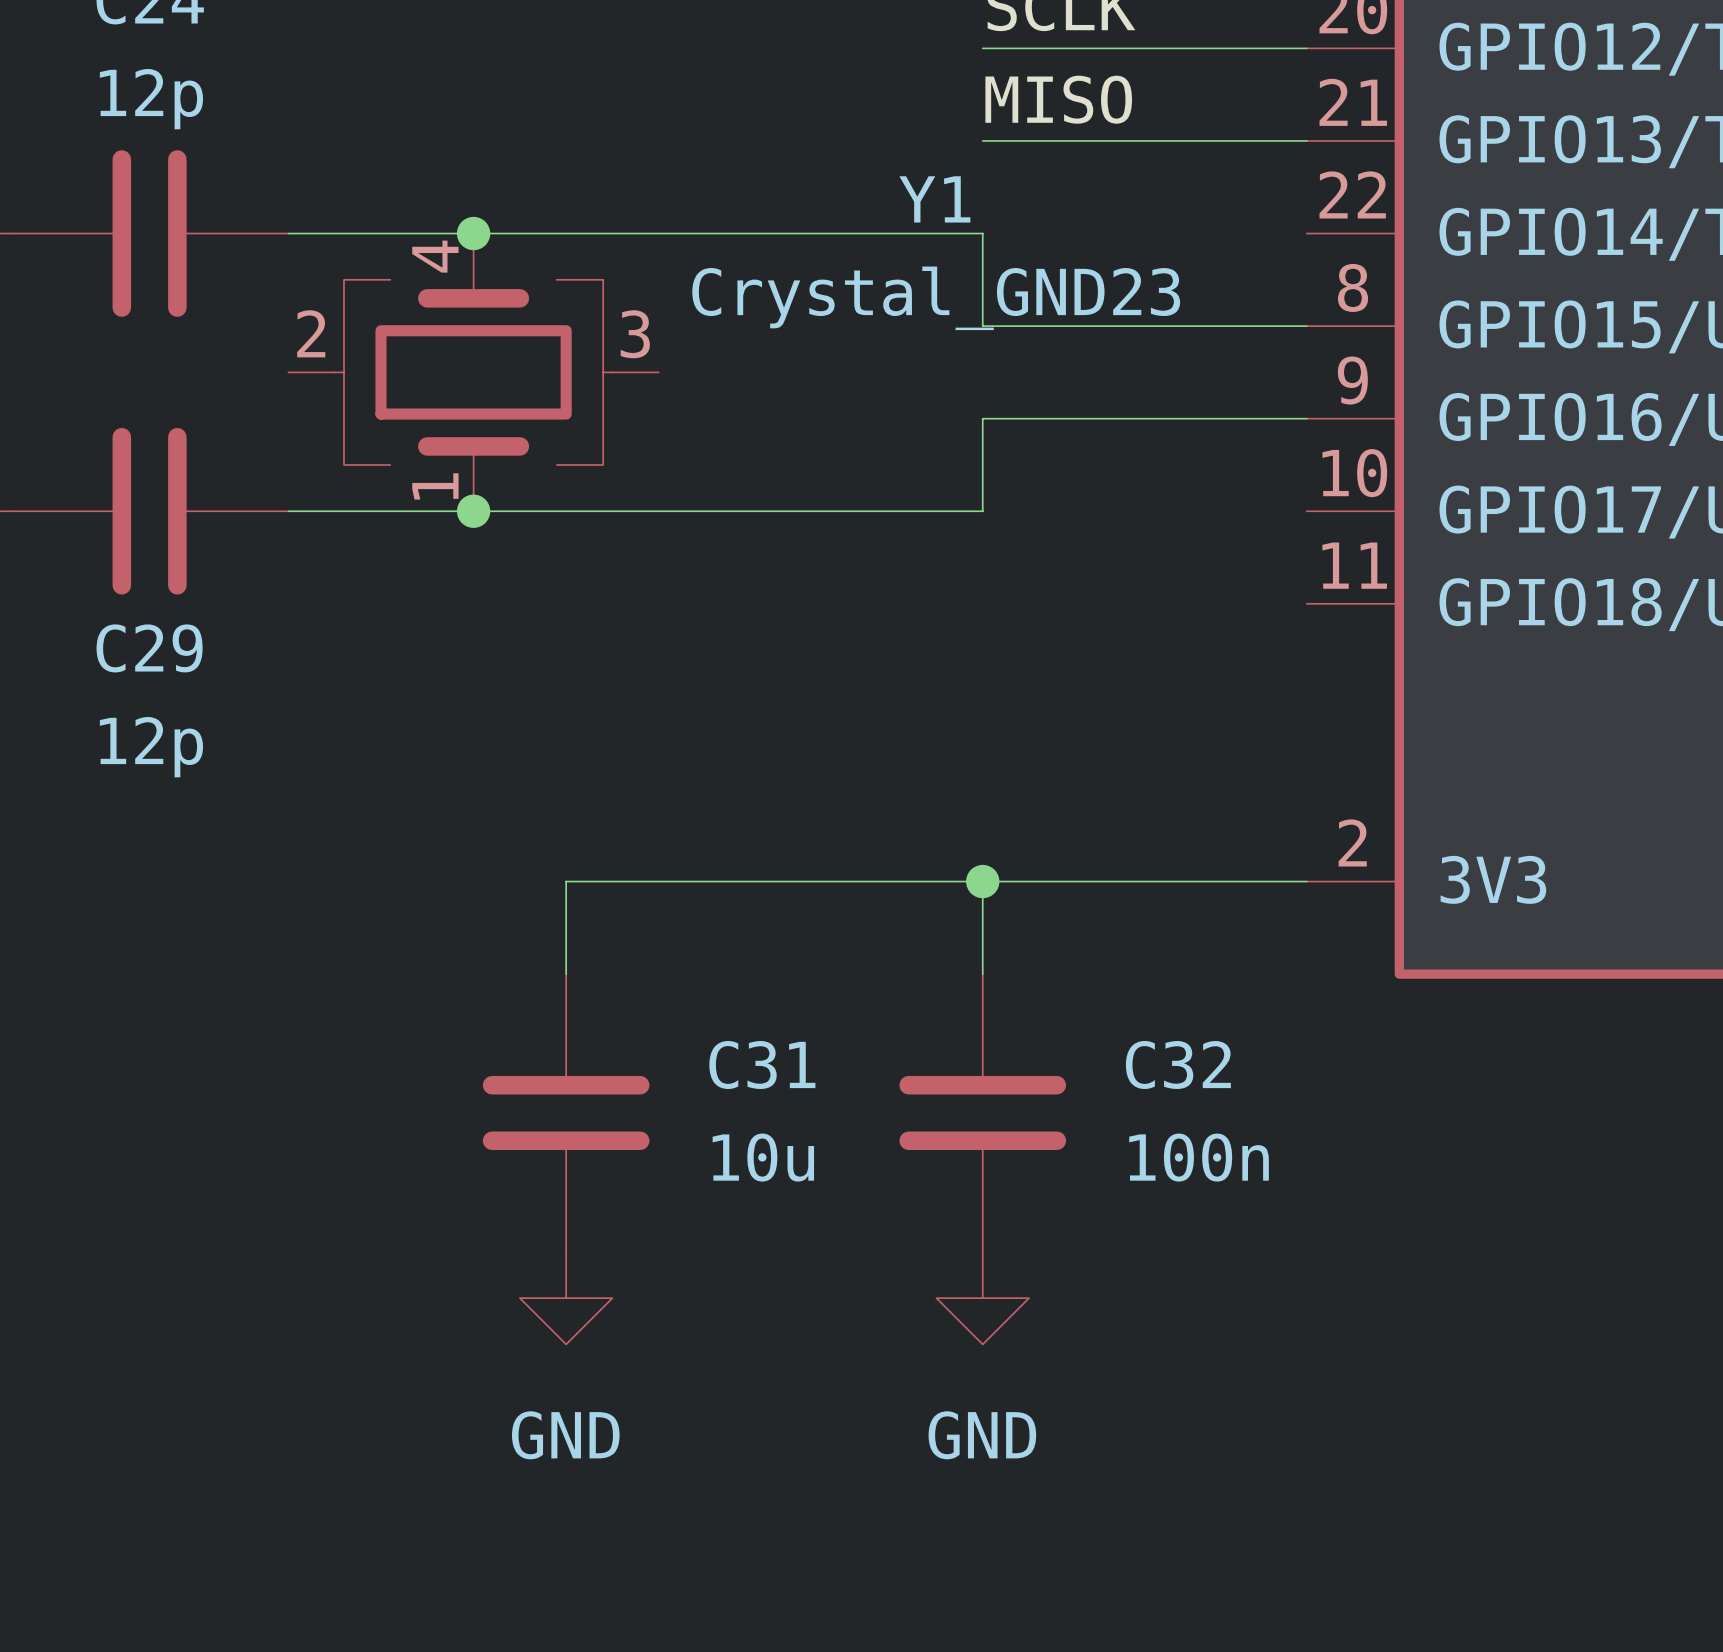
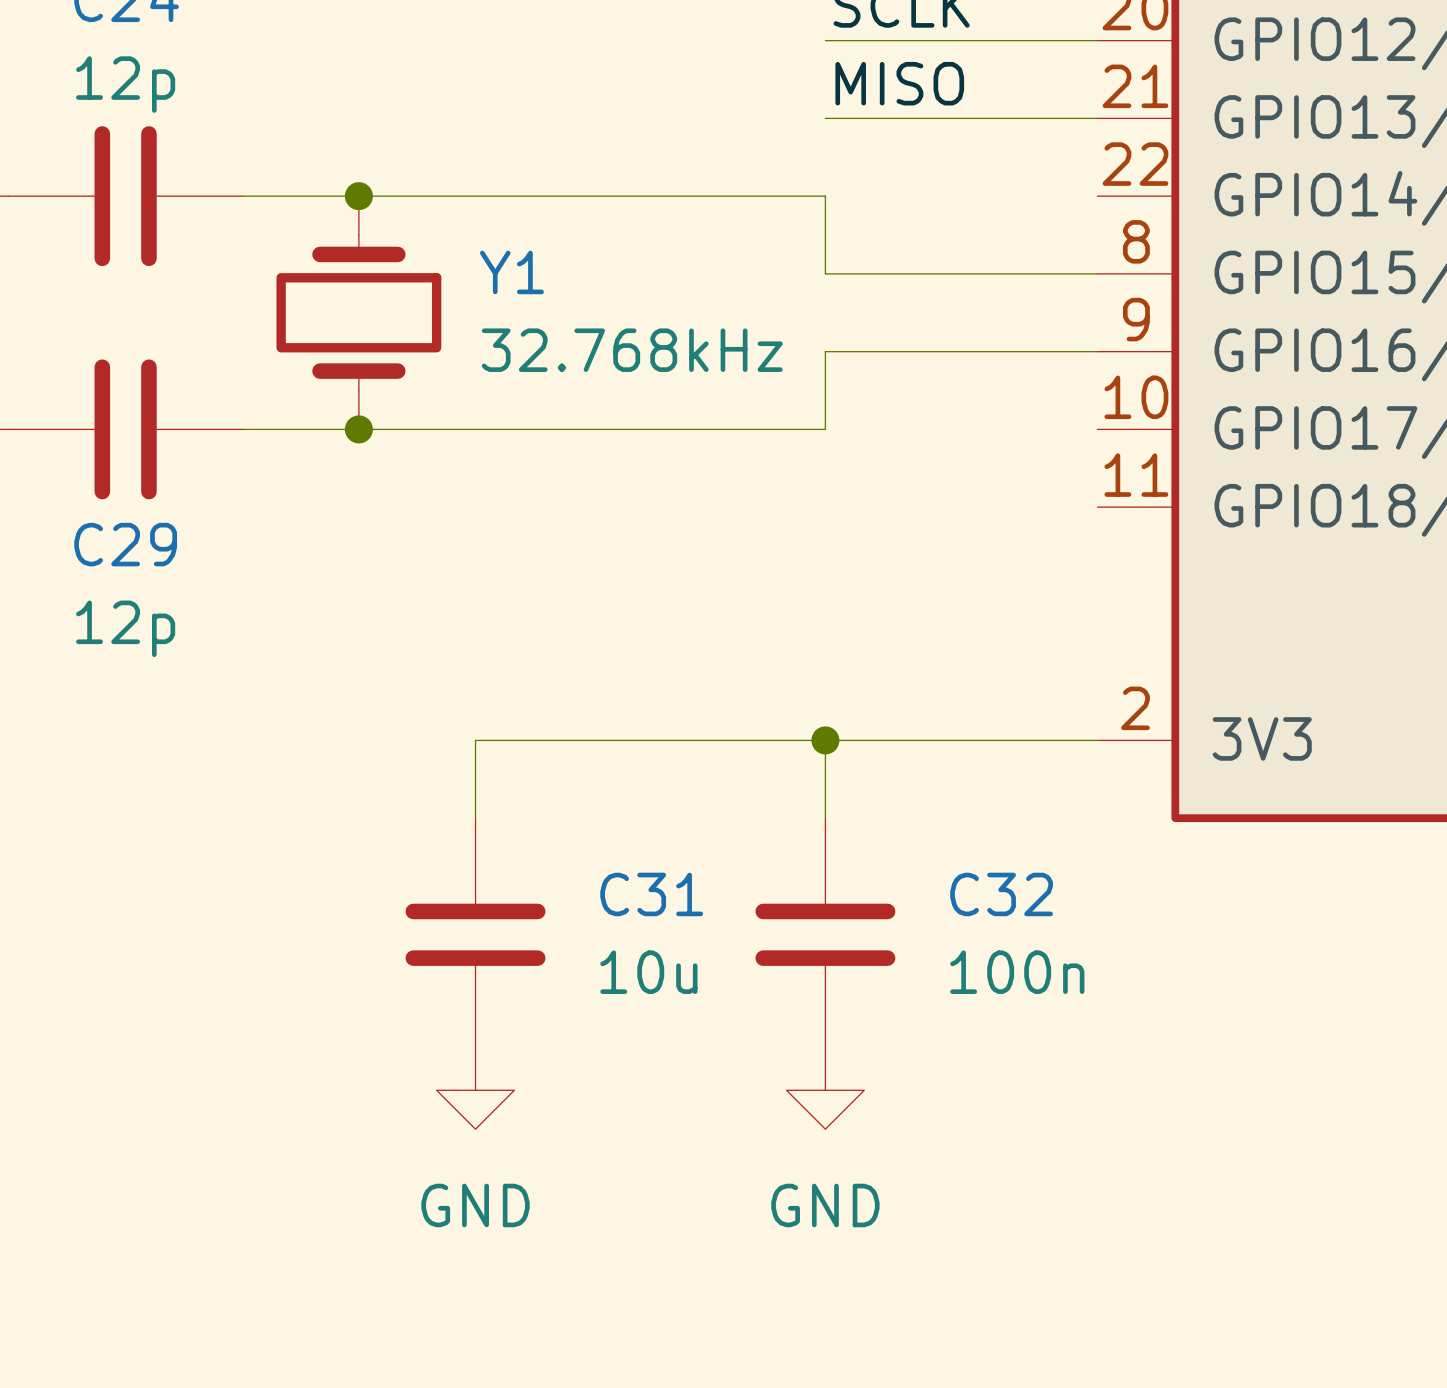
Y1 name position: Y1 (934, 199) -> Y1 (511, 272)
Y1 symbol: [288, 233, 659, 512] -> [276, 196, 442, 430]
junction position: (473, 233) -> (358, 196)
Y1 value: Crystal_GND23 (936, 298) -> 32.768kHz (632, 350)
junction position: (473, 511) -> (358, 429)

